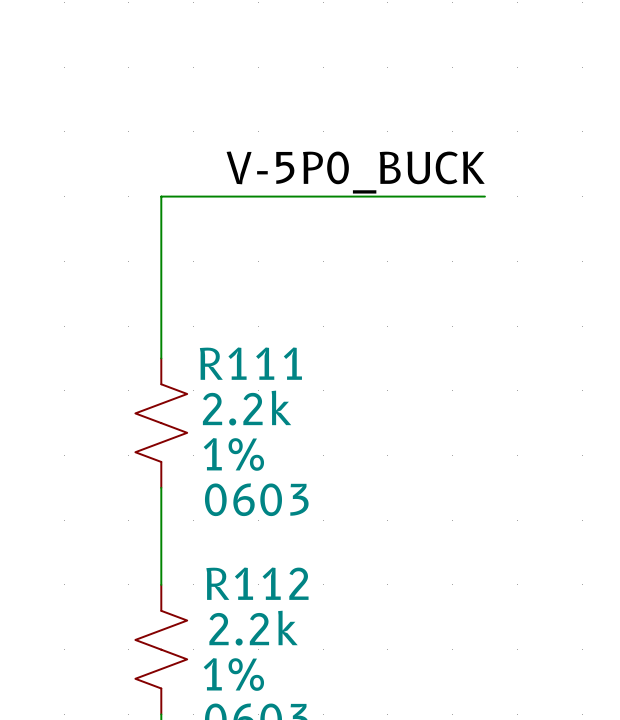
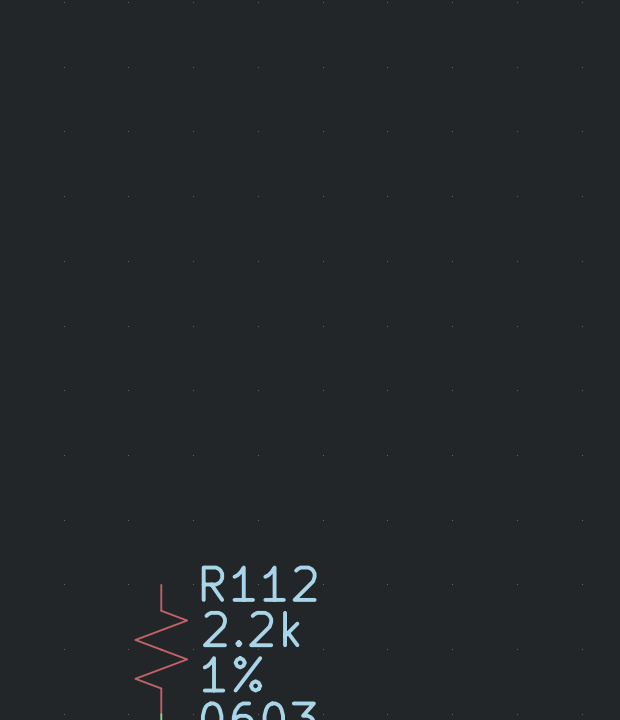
label: V-5P0_BUCK (355, 172) -> none
wire: (484, 196) (161, 196) (161, 358) -> none
R111: 2.2k (161, 423) -> none
wire: (161, 487) (161, 584) -> none

